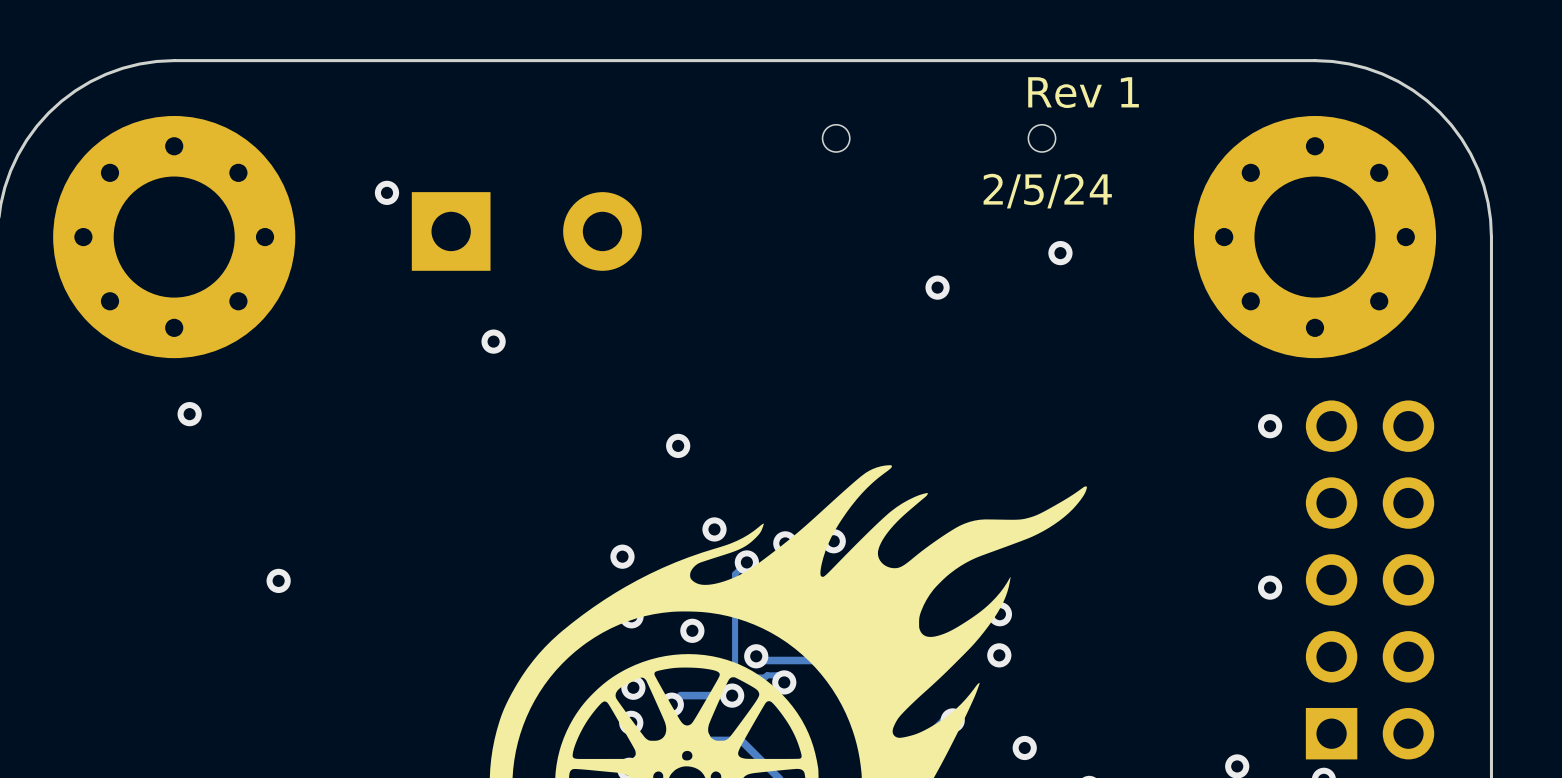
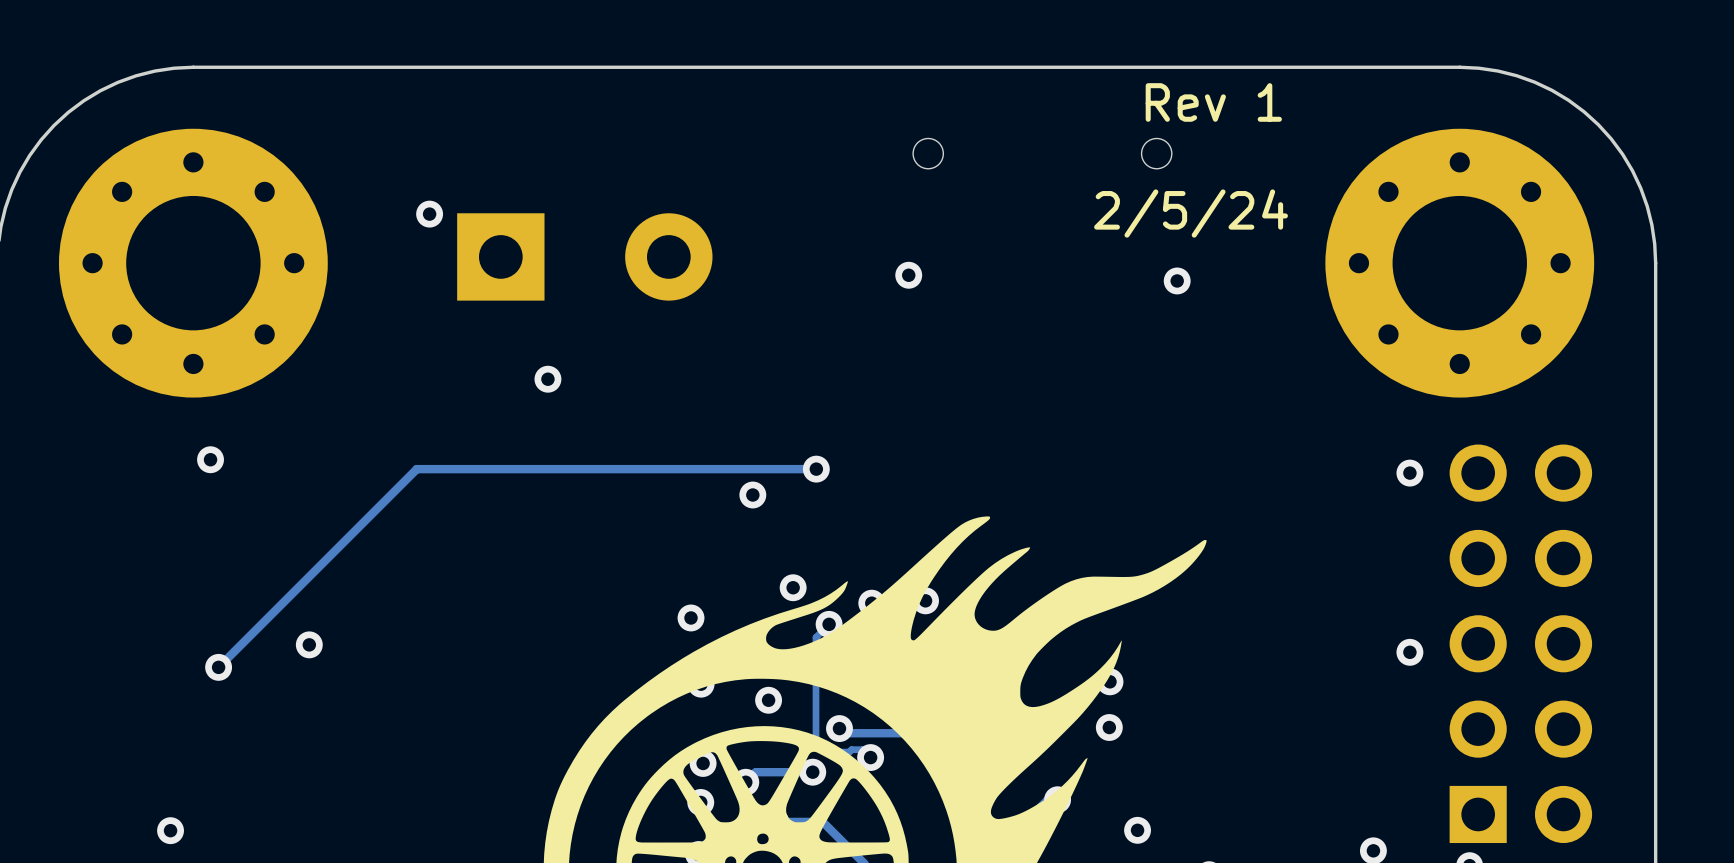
via: none -> (908, 275)
via: (937, 287) -> none
track: none -> (816, 469) (416, 469) (218, 667)
via: none -> (816, 469)
via: none -> (218, 667)
via: none -> (170, 830)

